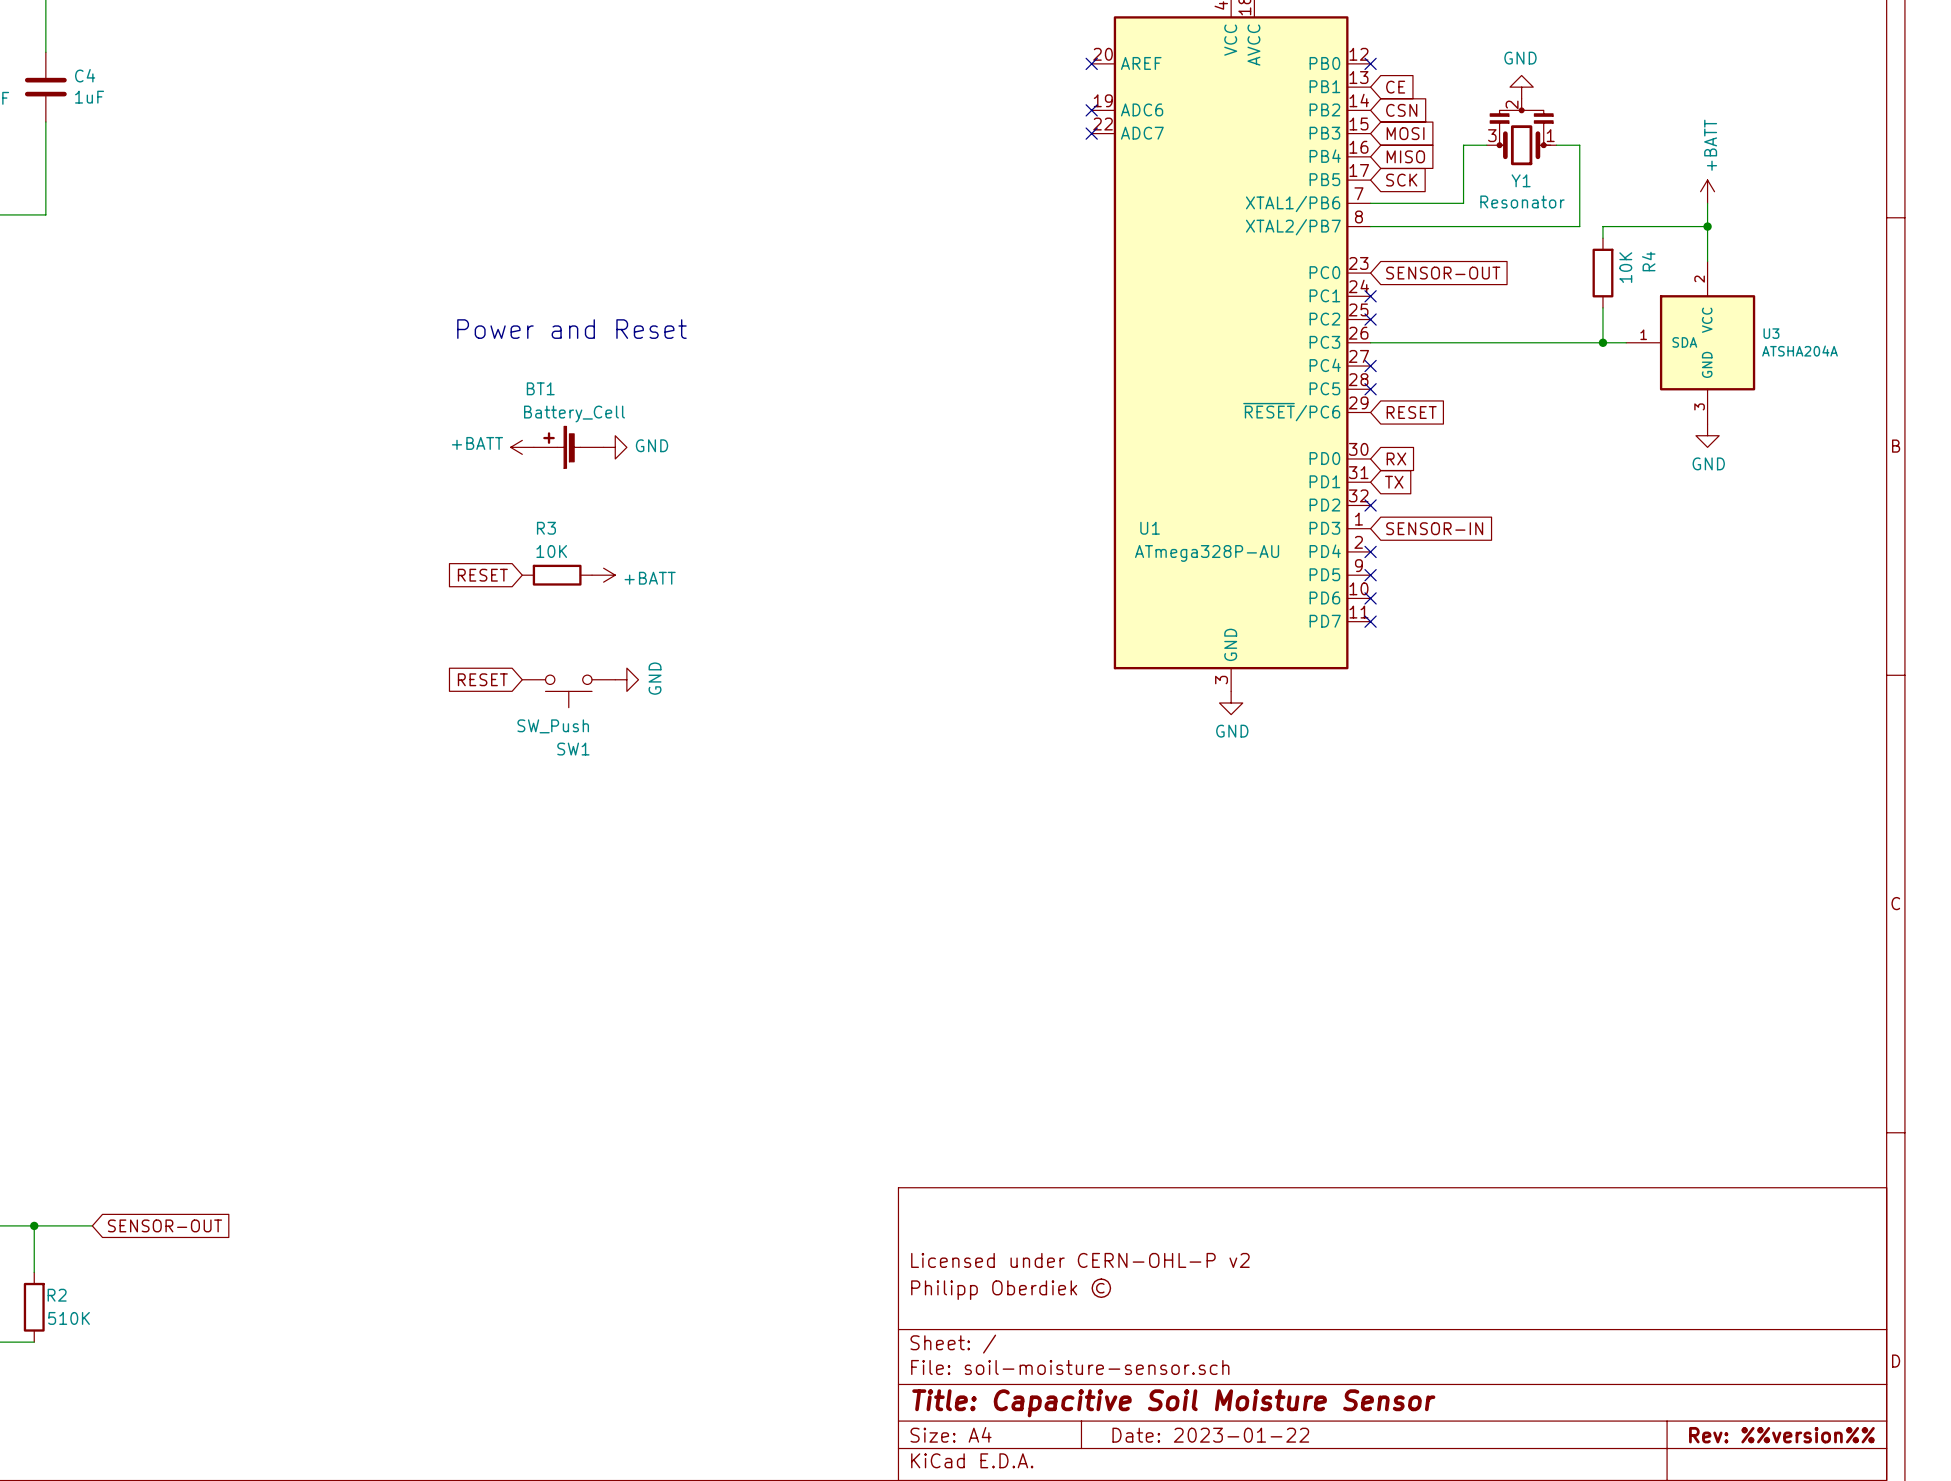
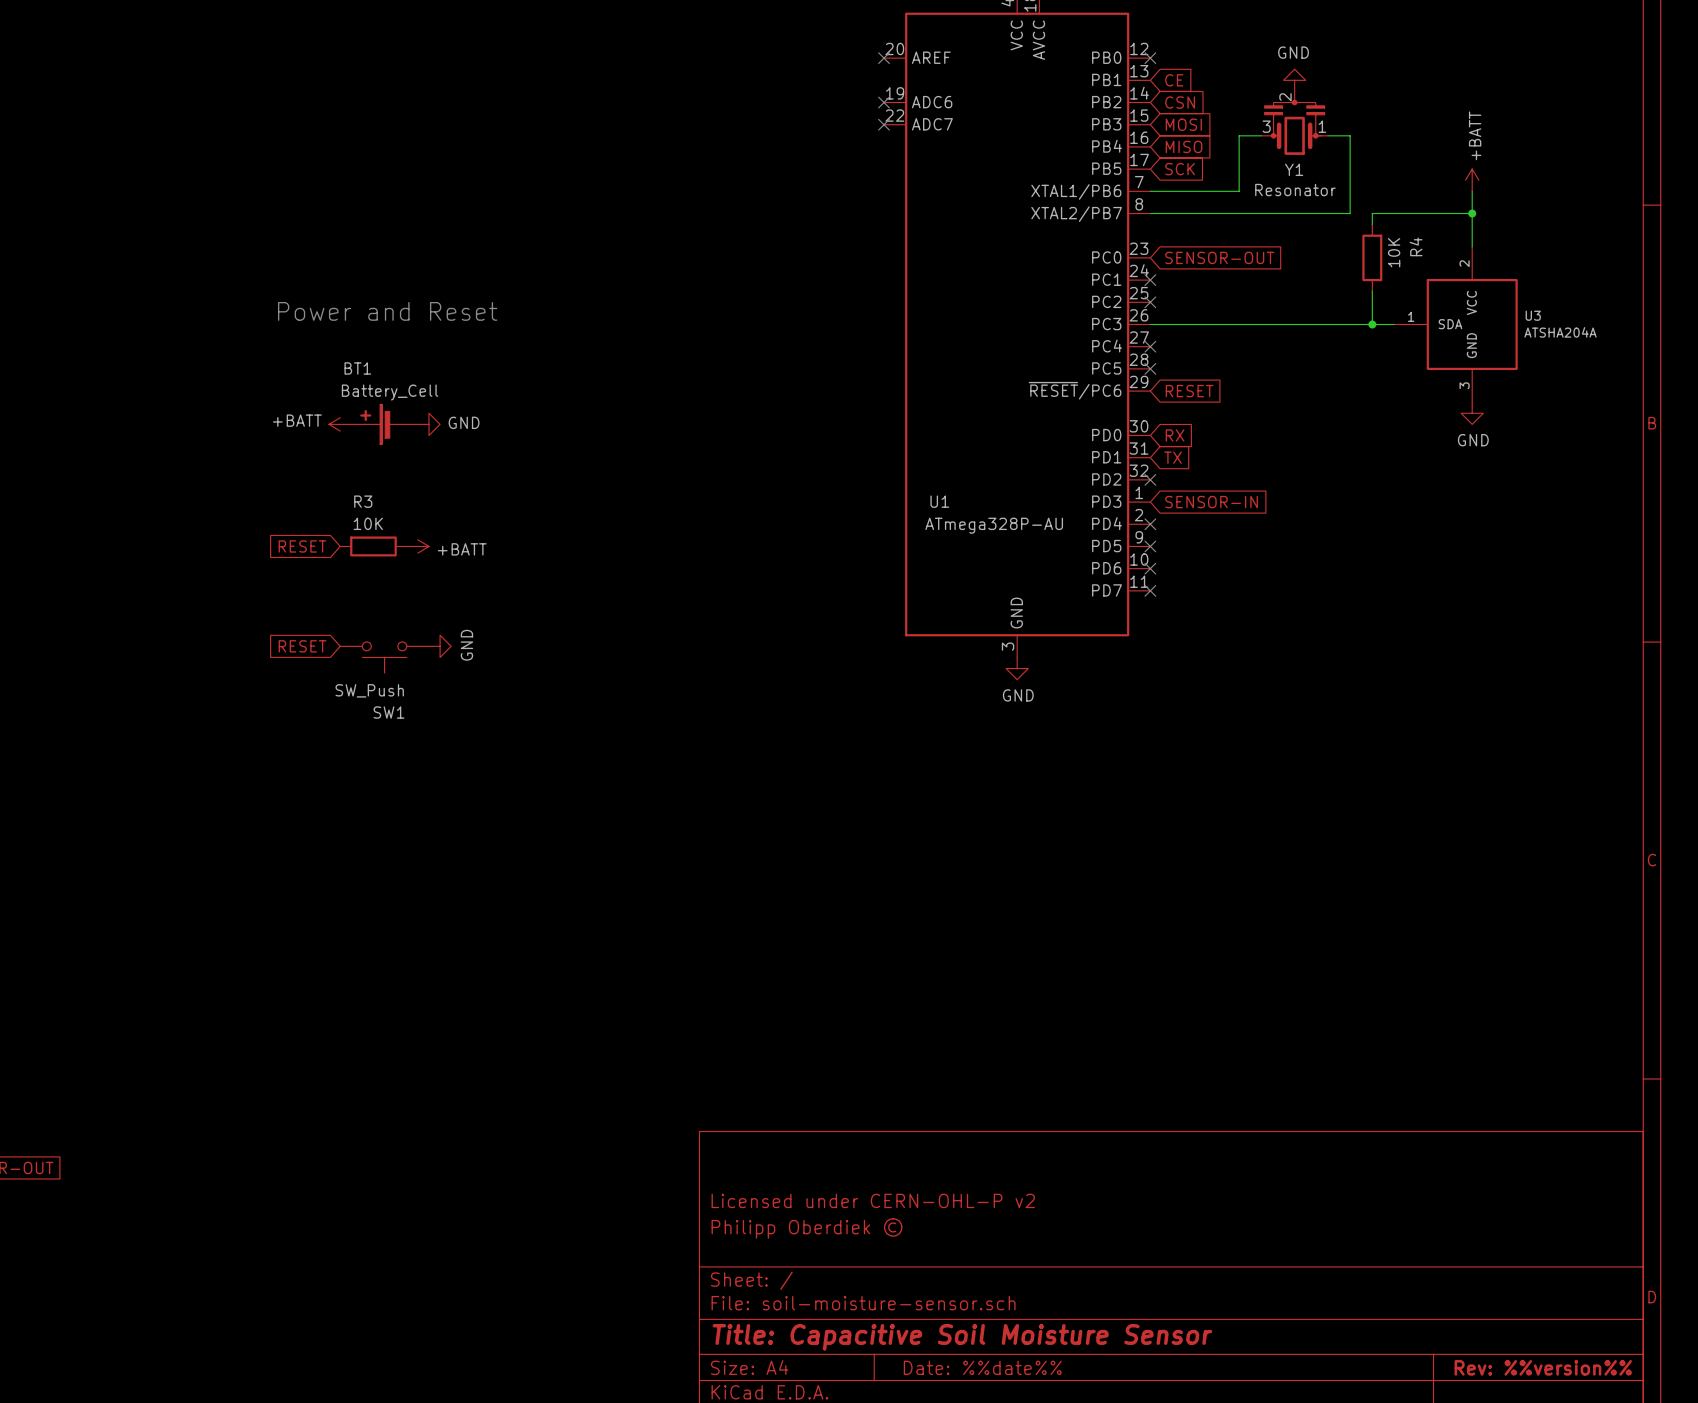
title block: Date: 2023-01-22 (1210, 1435) -> Date: %%date%% (982, 1367)

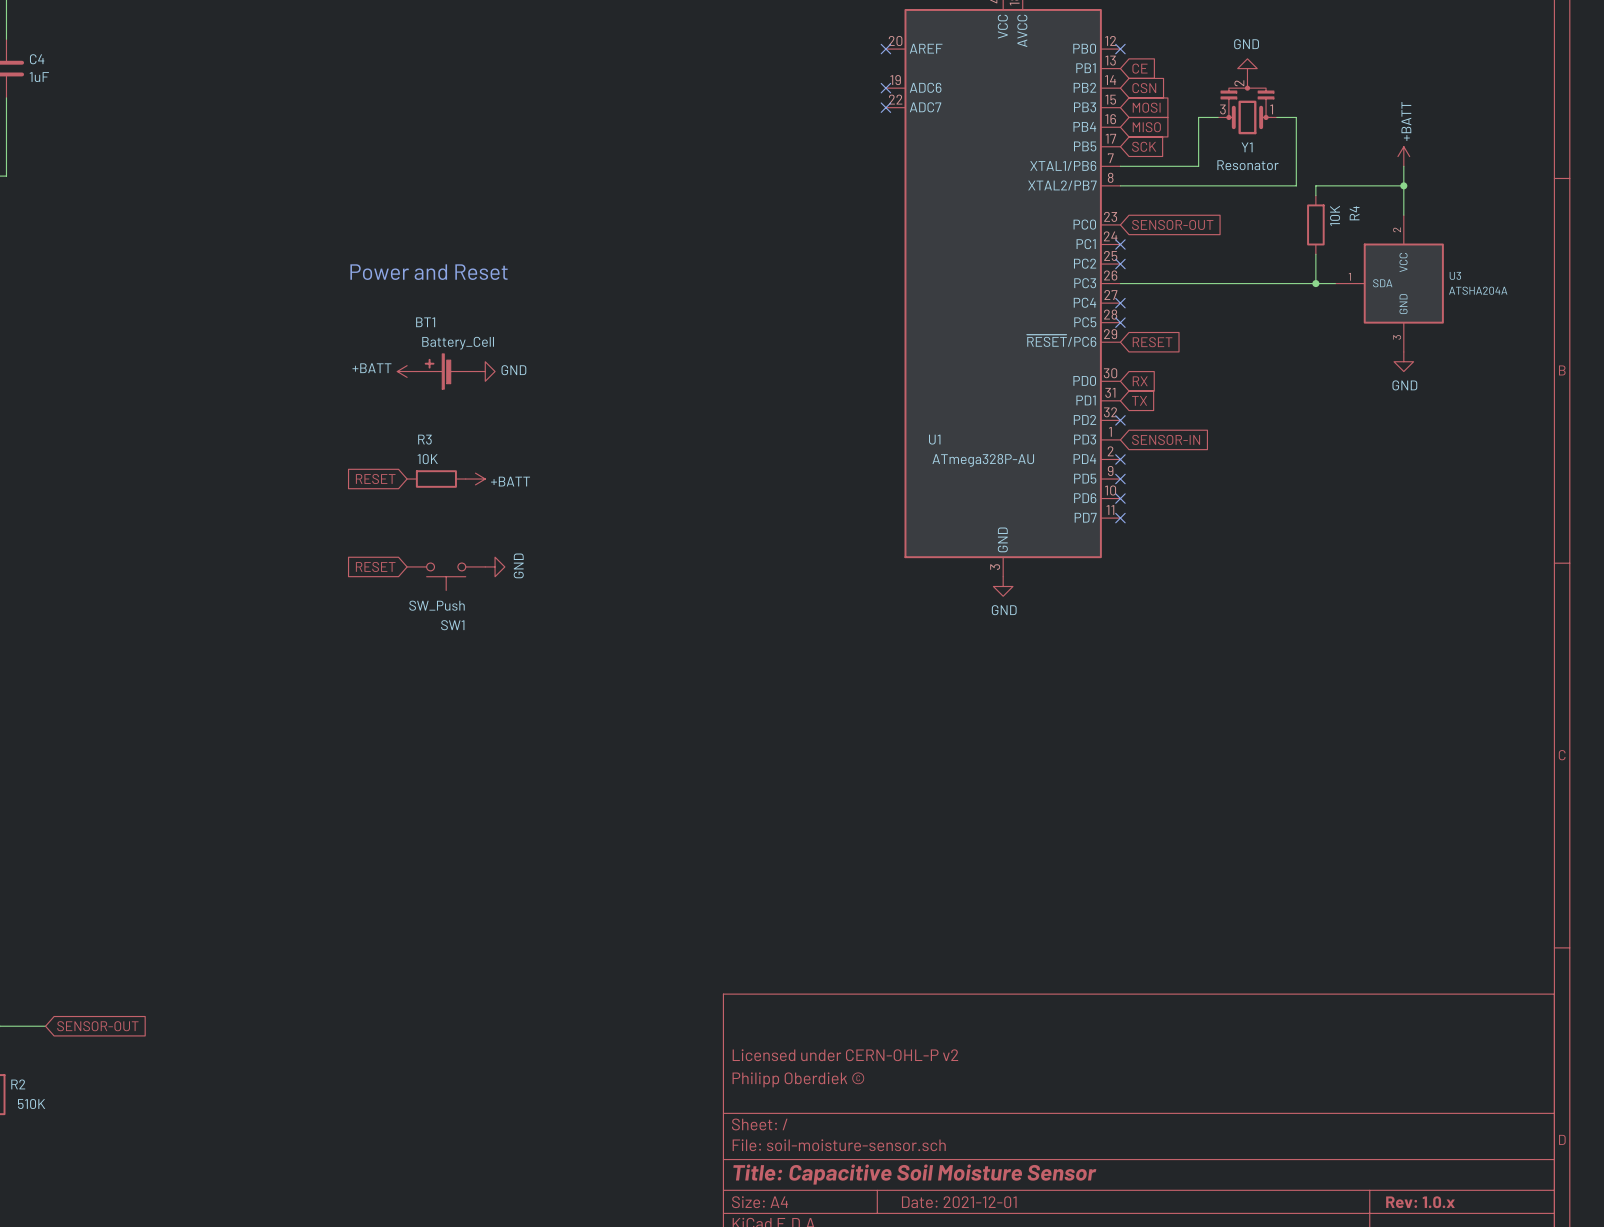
title block: Date: %%date%% (982, 1367) -> Date: 2021-12-01 (959, 1202)
title block: Rev: %%version%% (1543, 1367) -> Rev: 1.0.x (1420, 1202)

